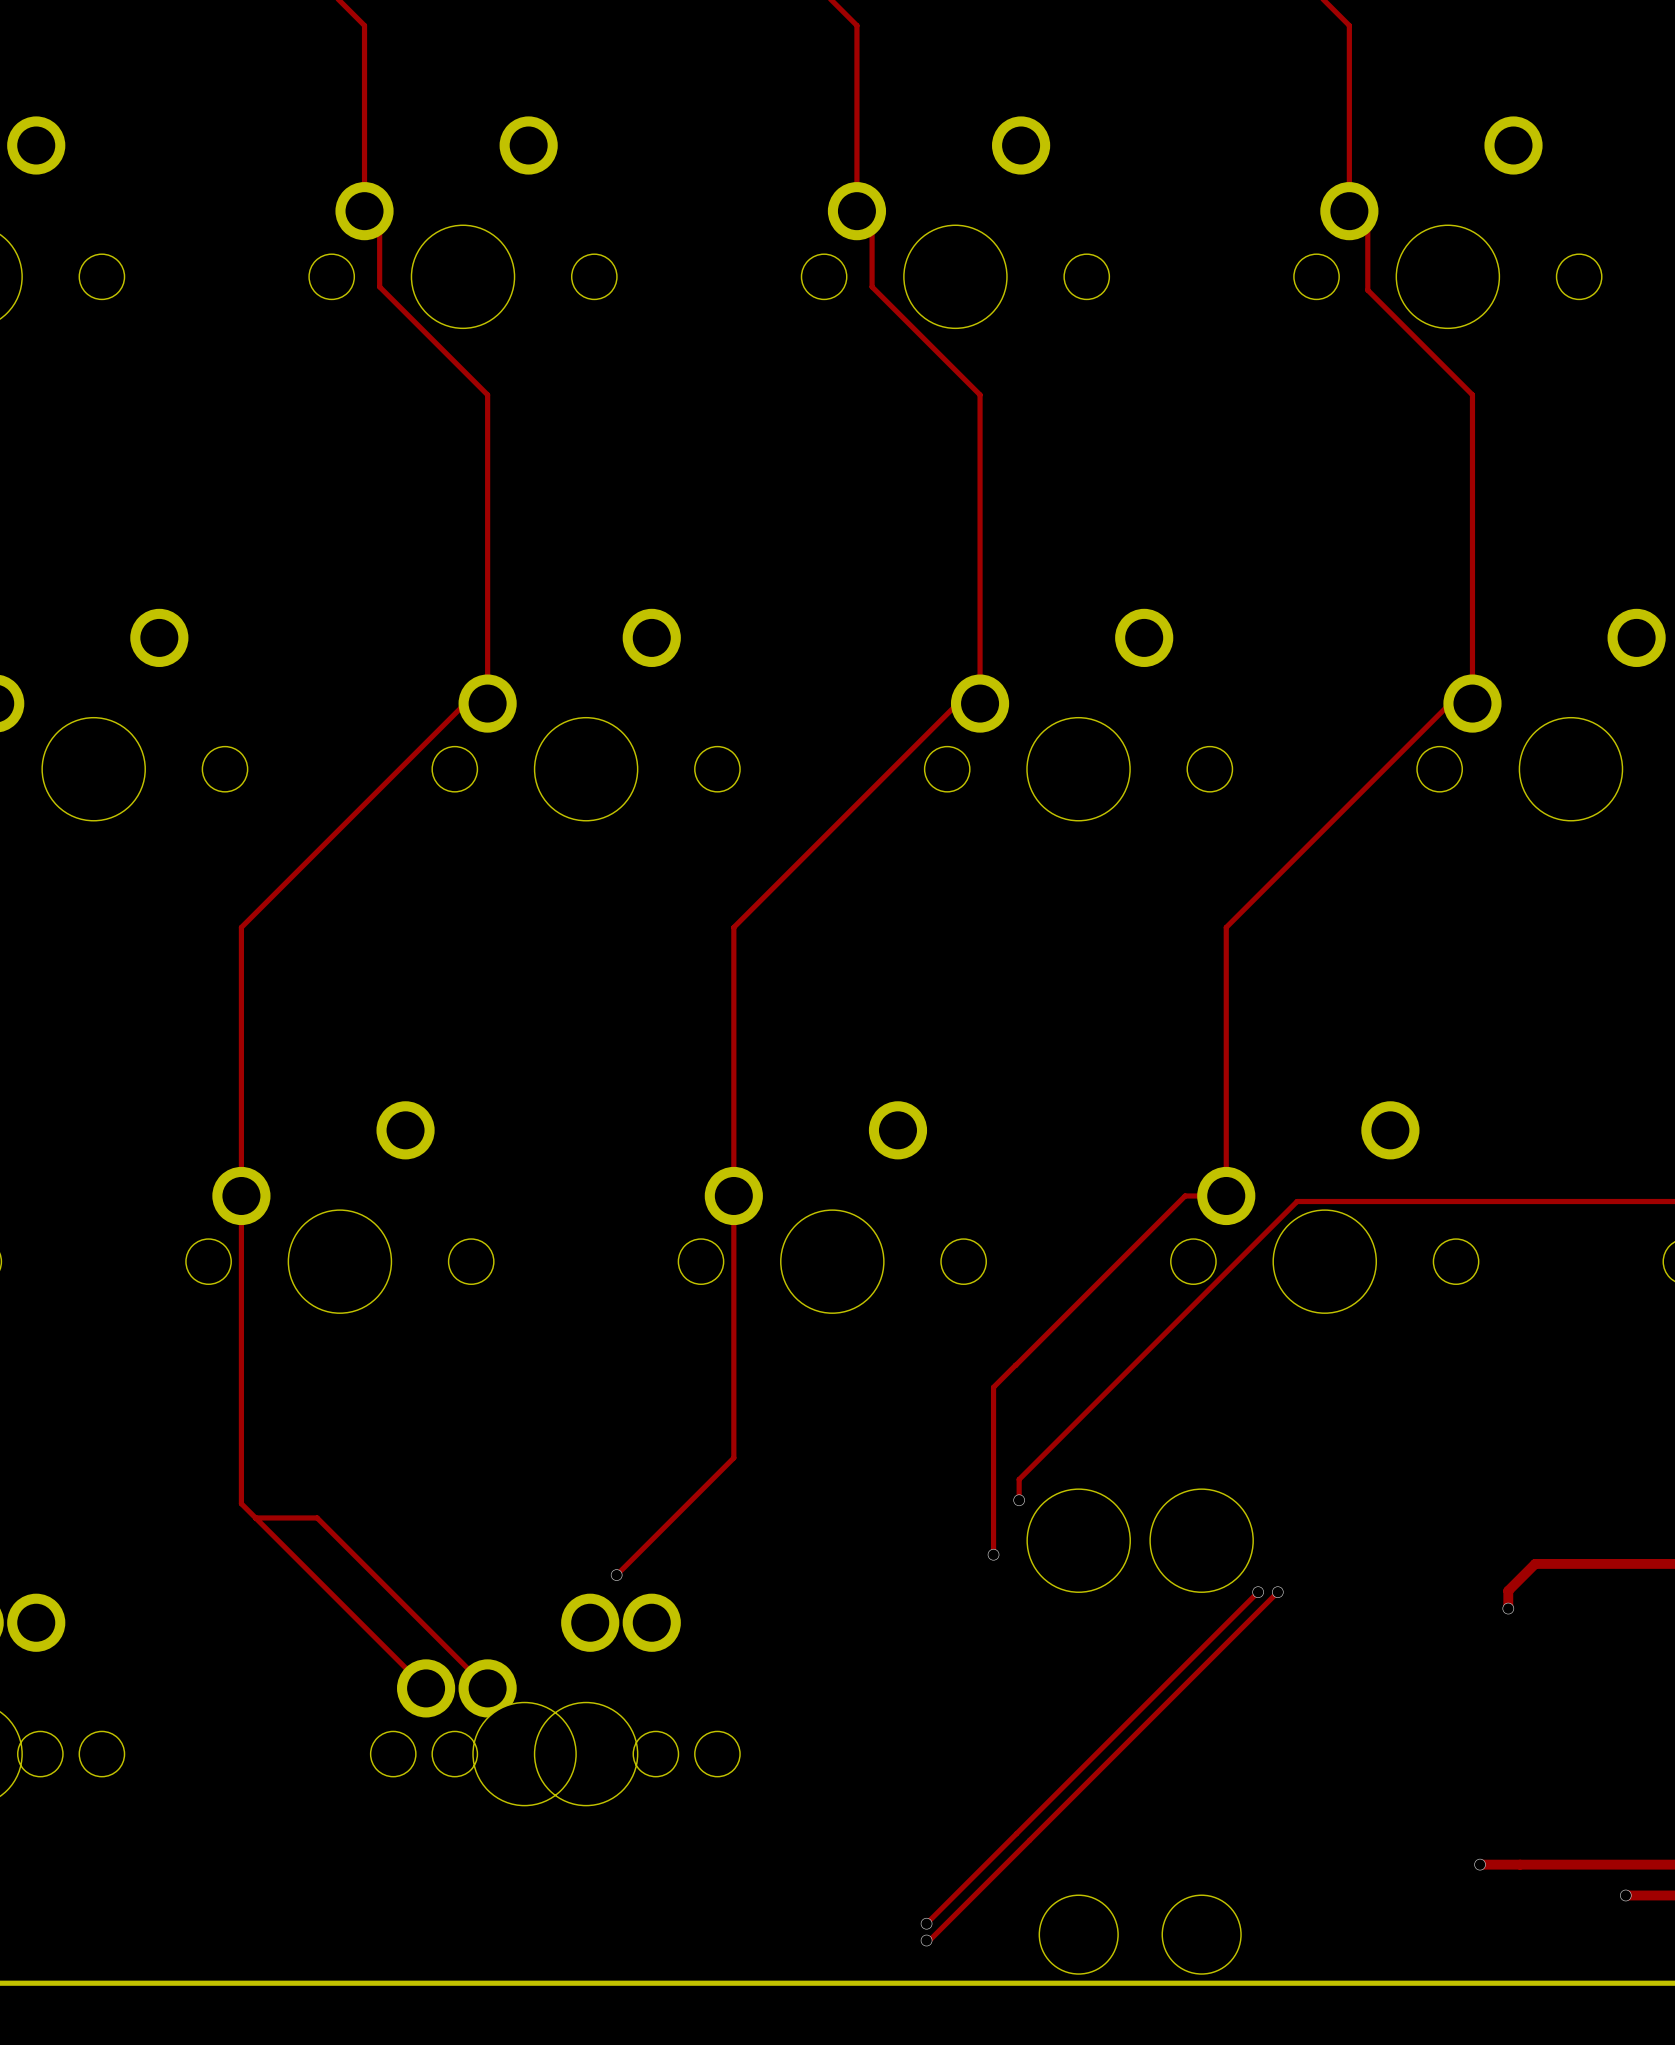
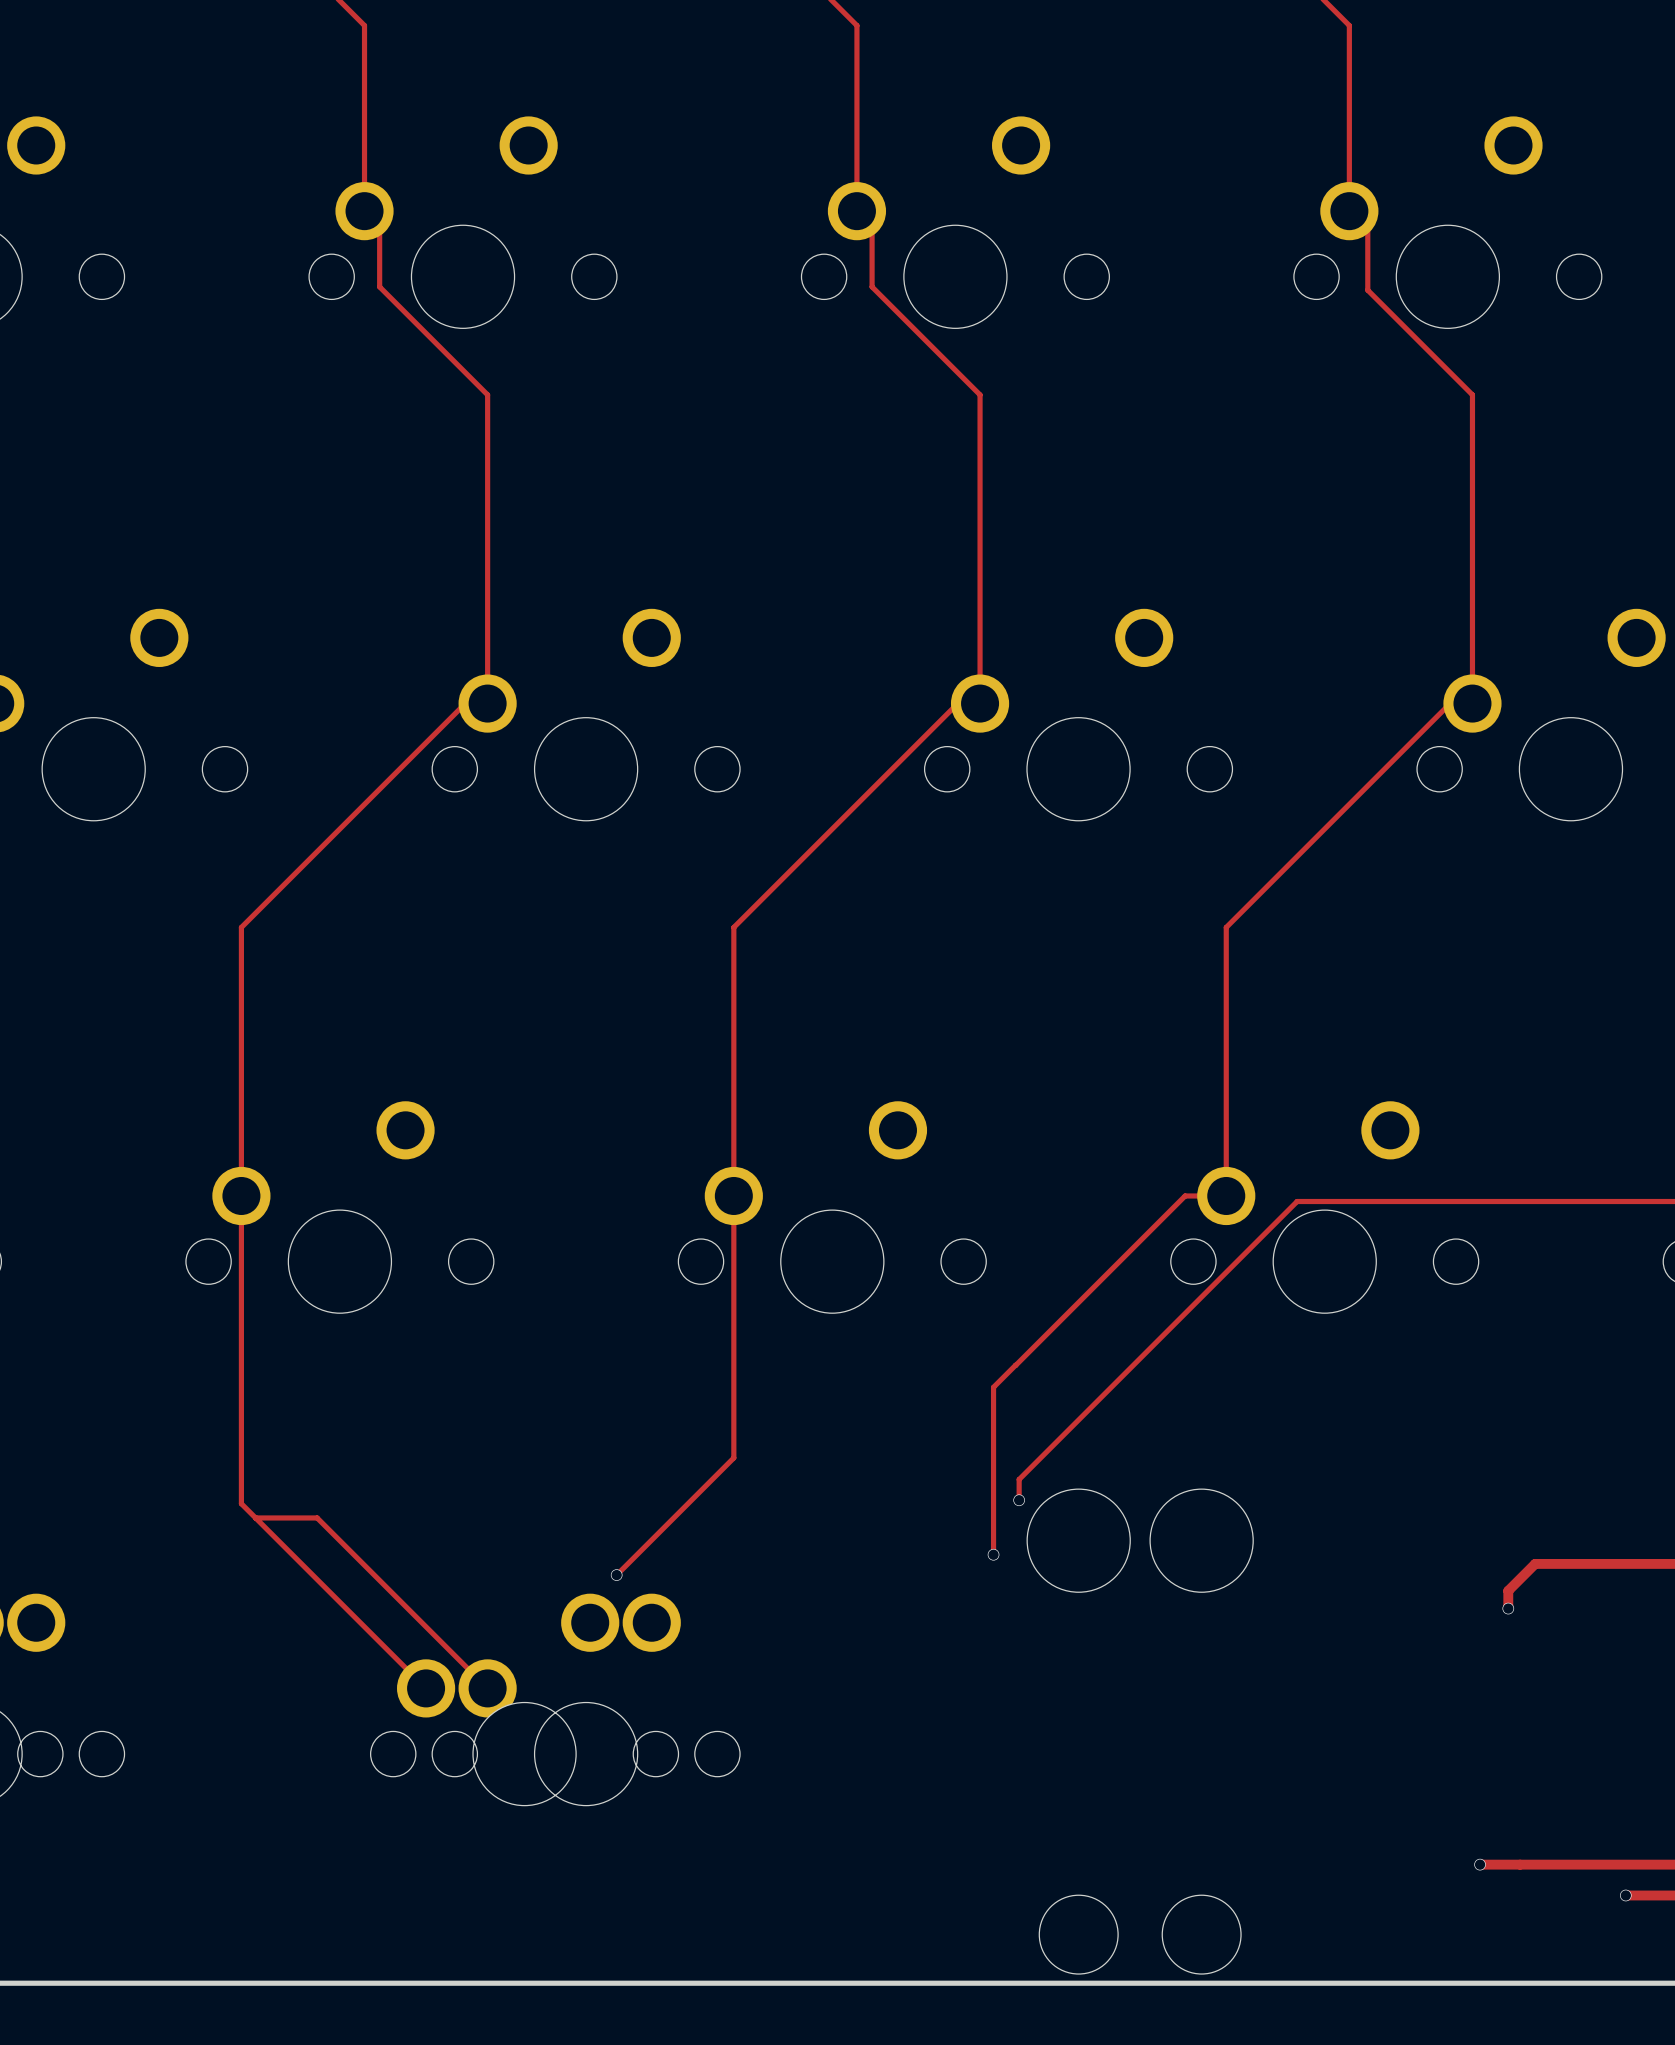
track: (1258, 1592) (926, 1923) -> none
via: (1258, 1592) -> none
track: (1277, 1592) (929, 1940) (926, 1940) -> none
via: (1277, 1592) -> none
via: (926, 1923) -> none
via: (926, 1940) -> none

